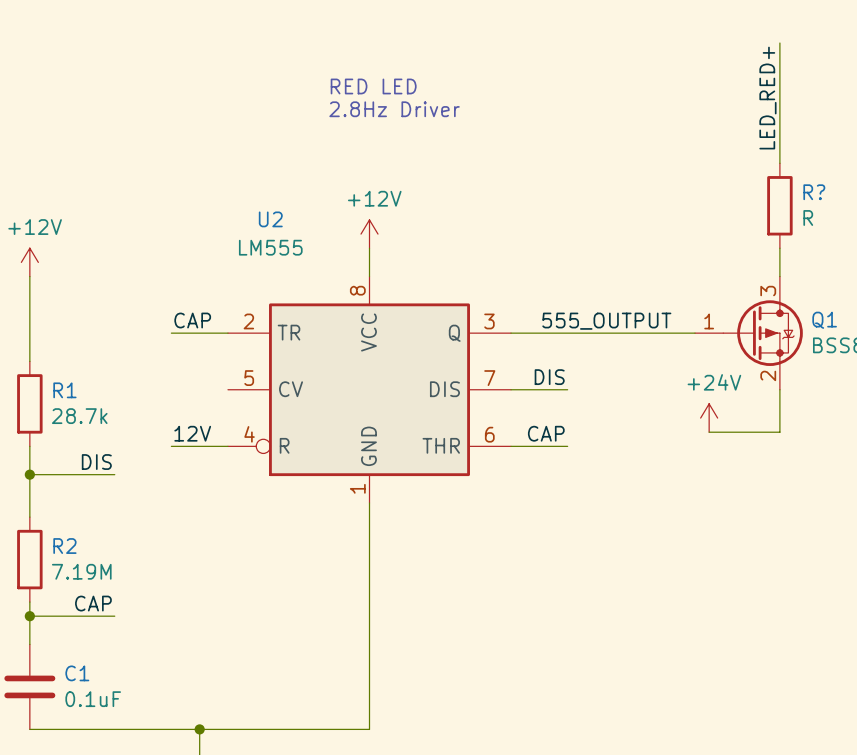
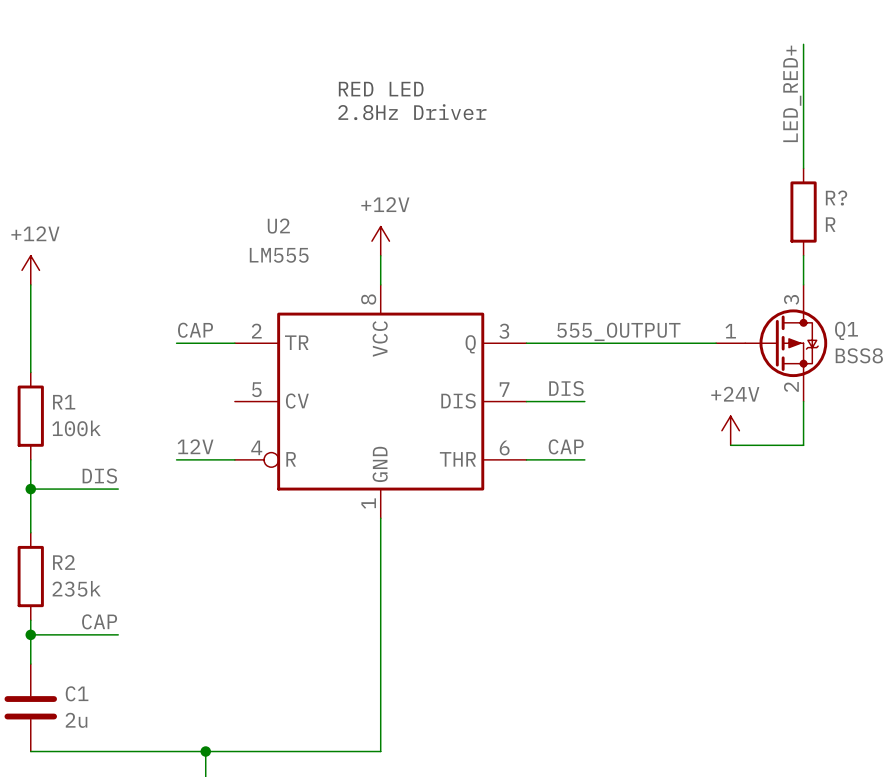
R1 value: 28.7k (79, 416) -> 100k (76, 428)
R2 value: 7.19M (81, 571) -> 235k (76, 588)
C1 value: 0.1uF (93, 699) -> 2u (76, 720)

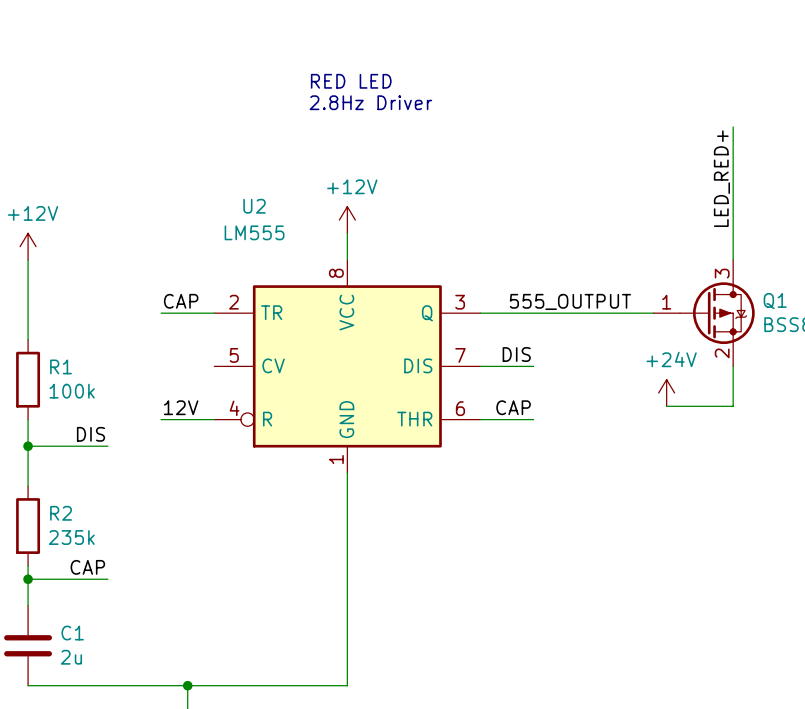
wire: (803, 44) (803, 139) -> none
label position: LED_RED+ (792, 93) -> LED_RED+ (721, 178)
wire: none -> (733, 153) (733, 233)
R?: R (803, 212) -> none

